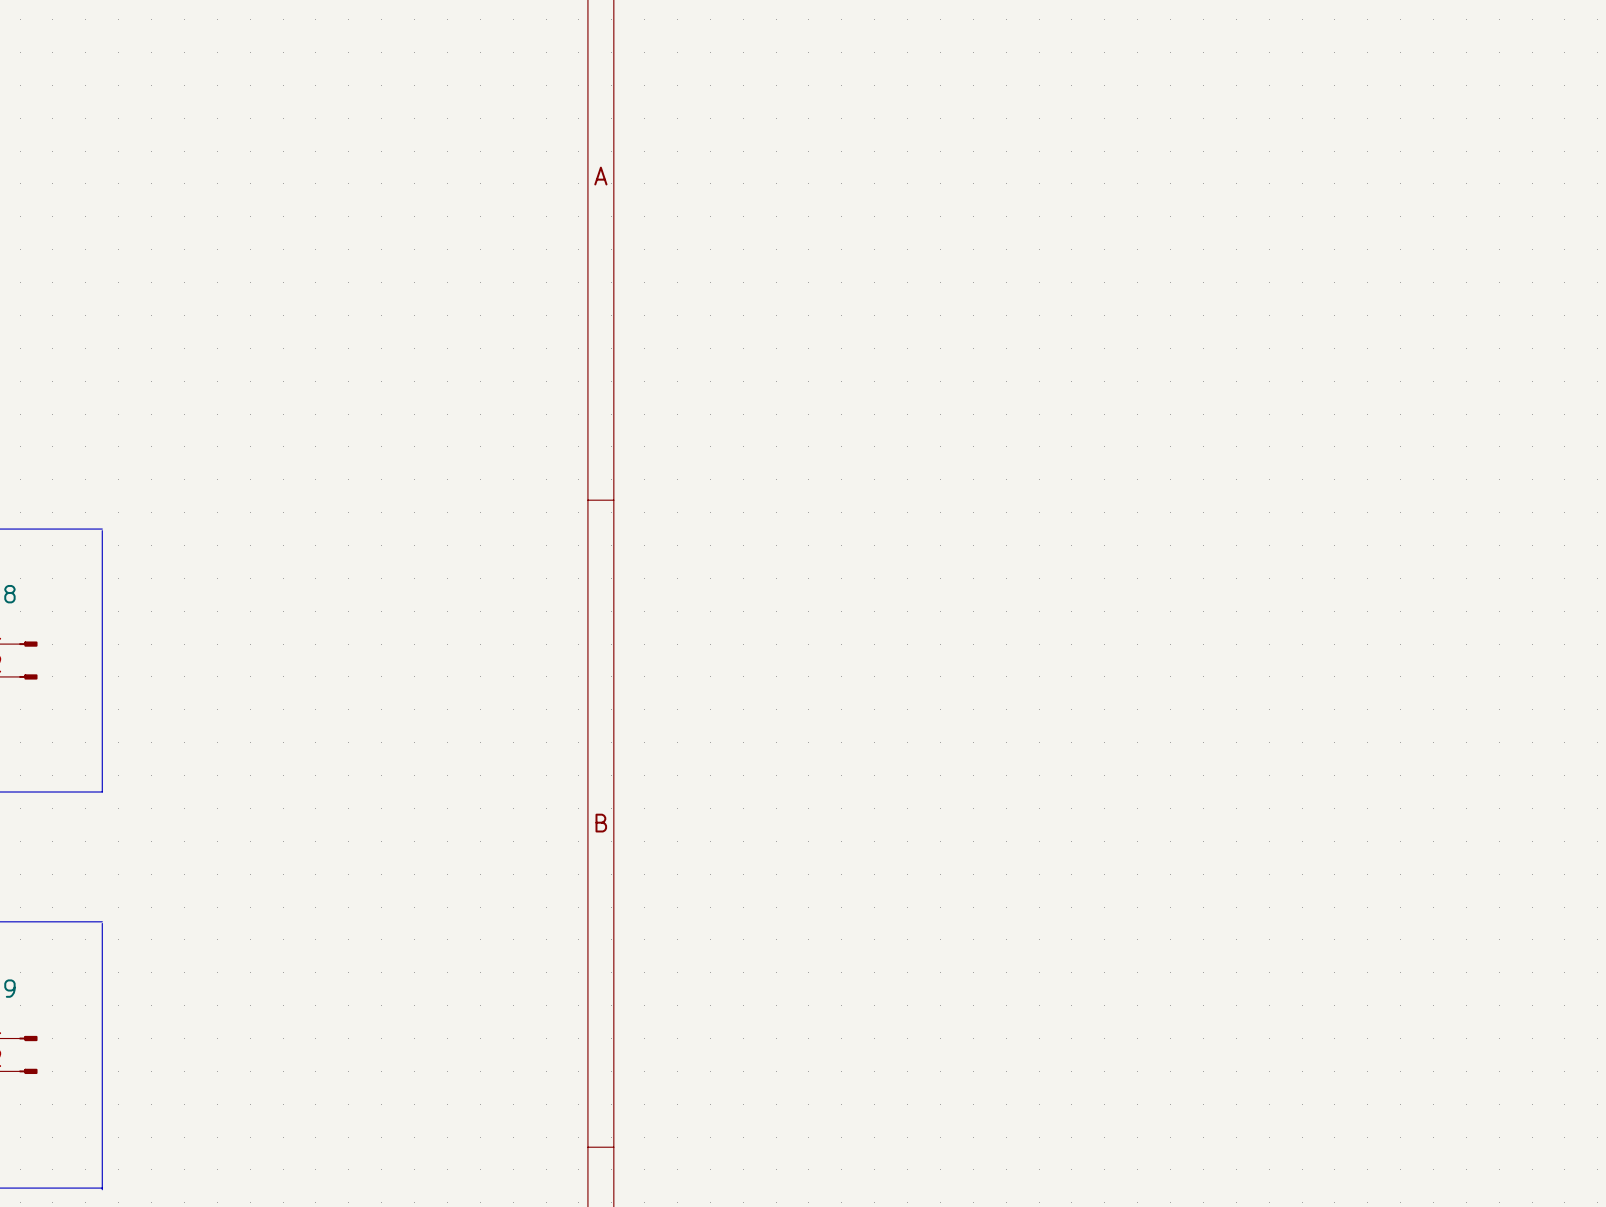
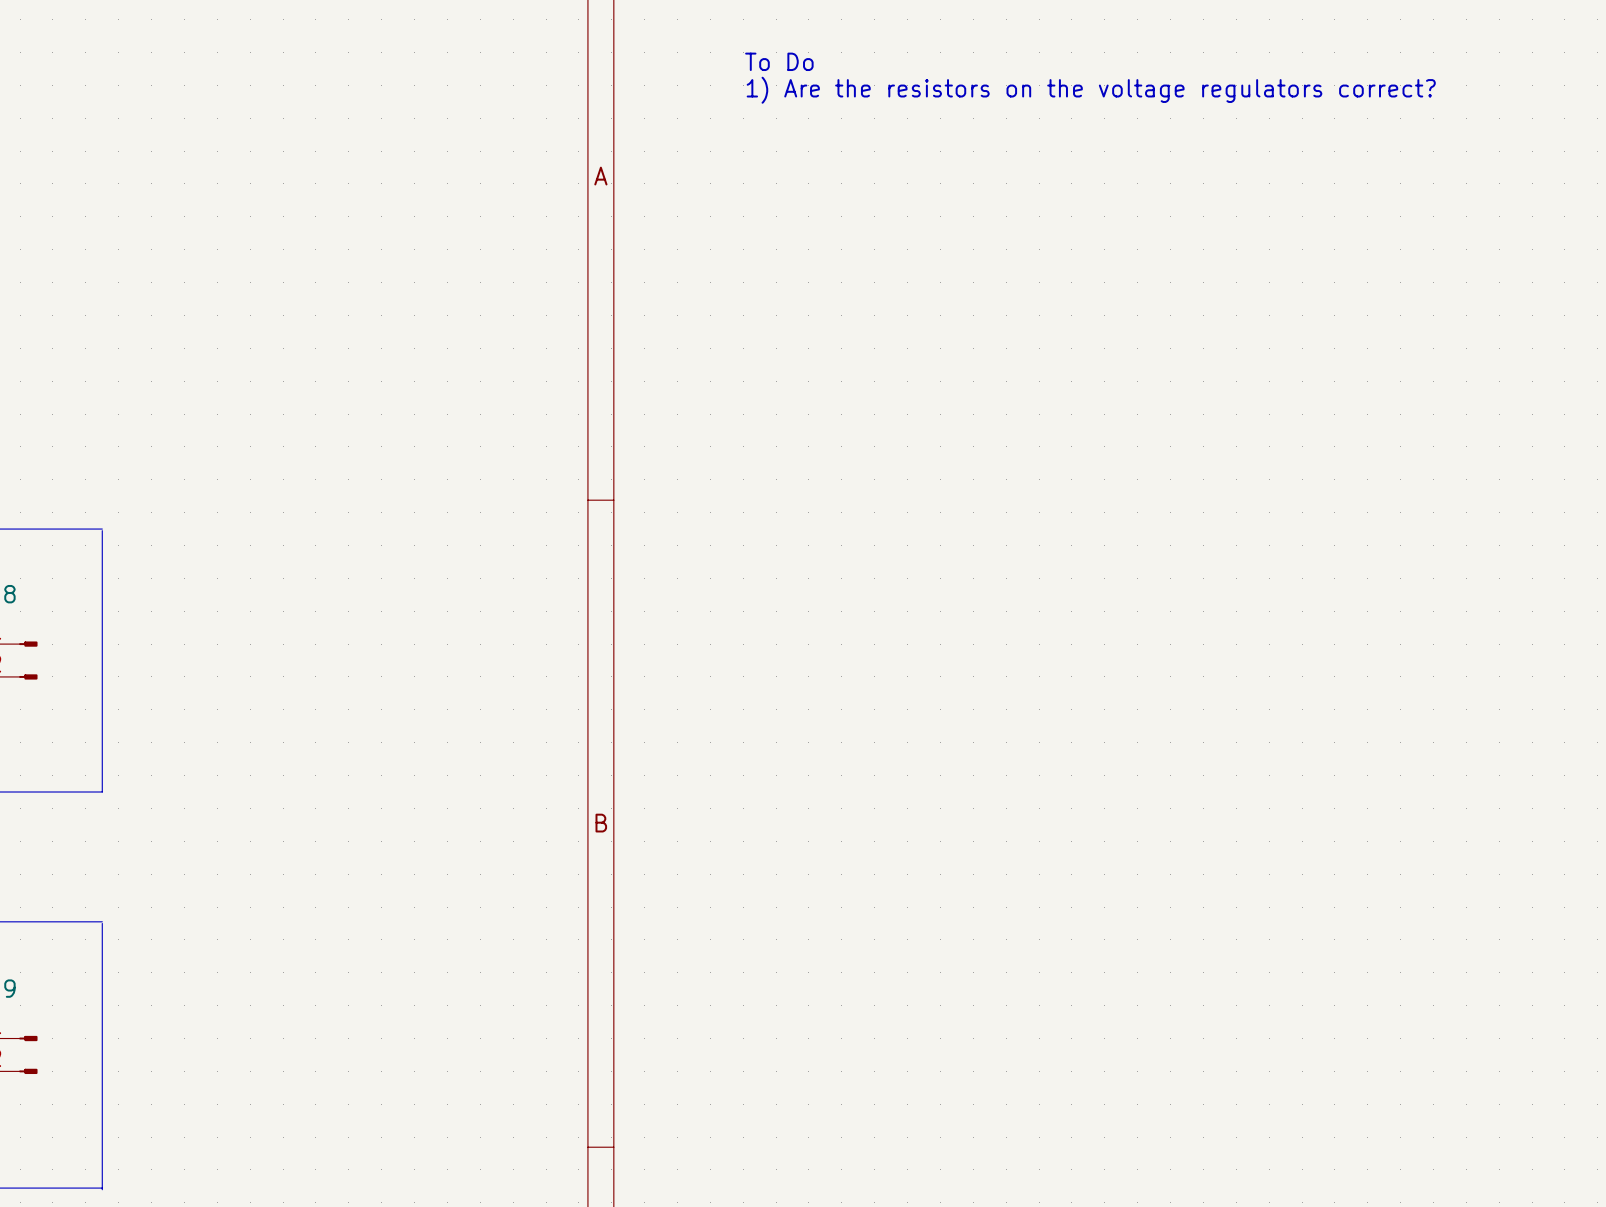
text: none -> To Do (779, 61)
text: none -> 1) Are the resistors on the voltage regulators correct? (1091, 90)

